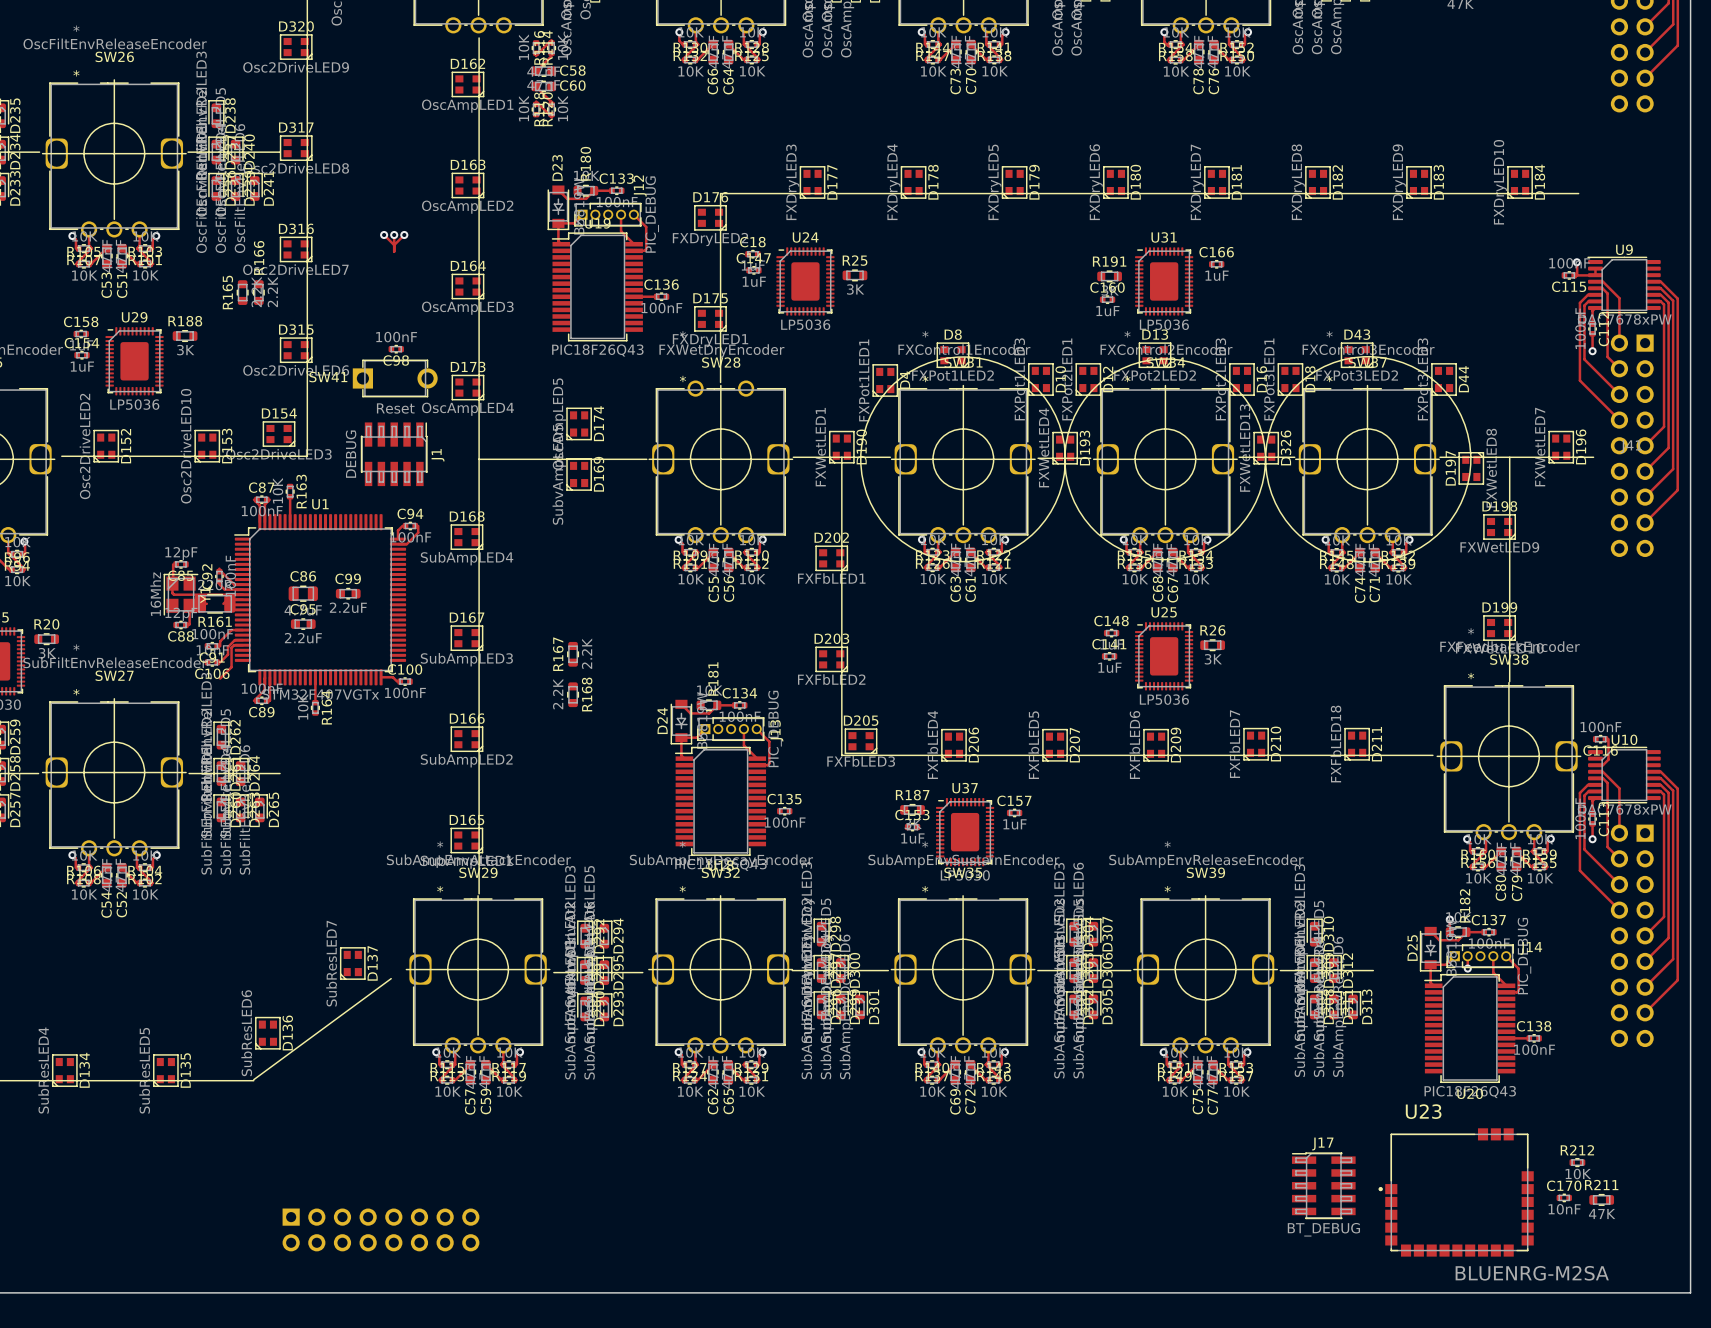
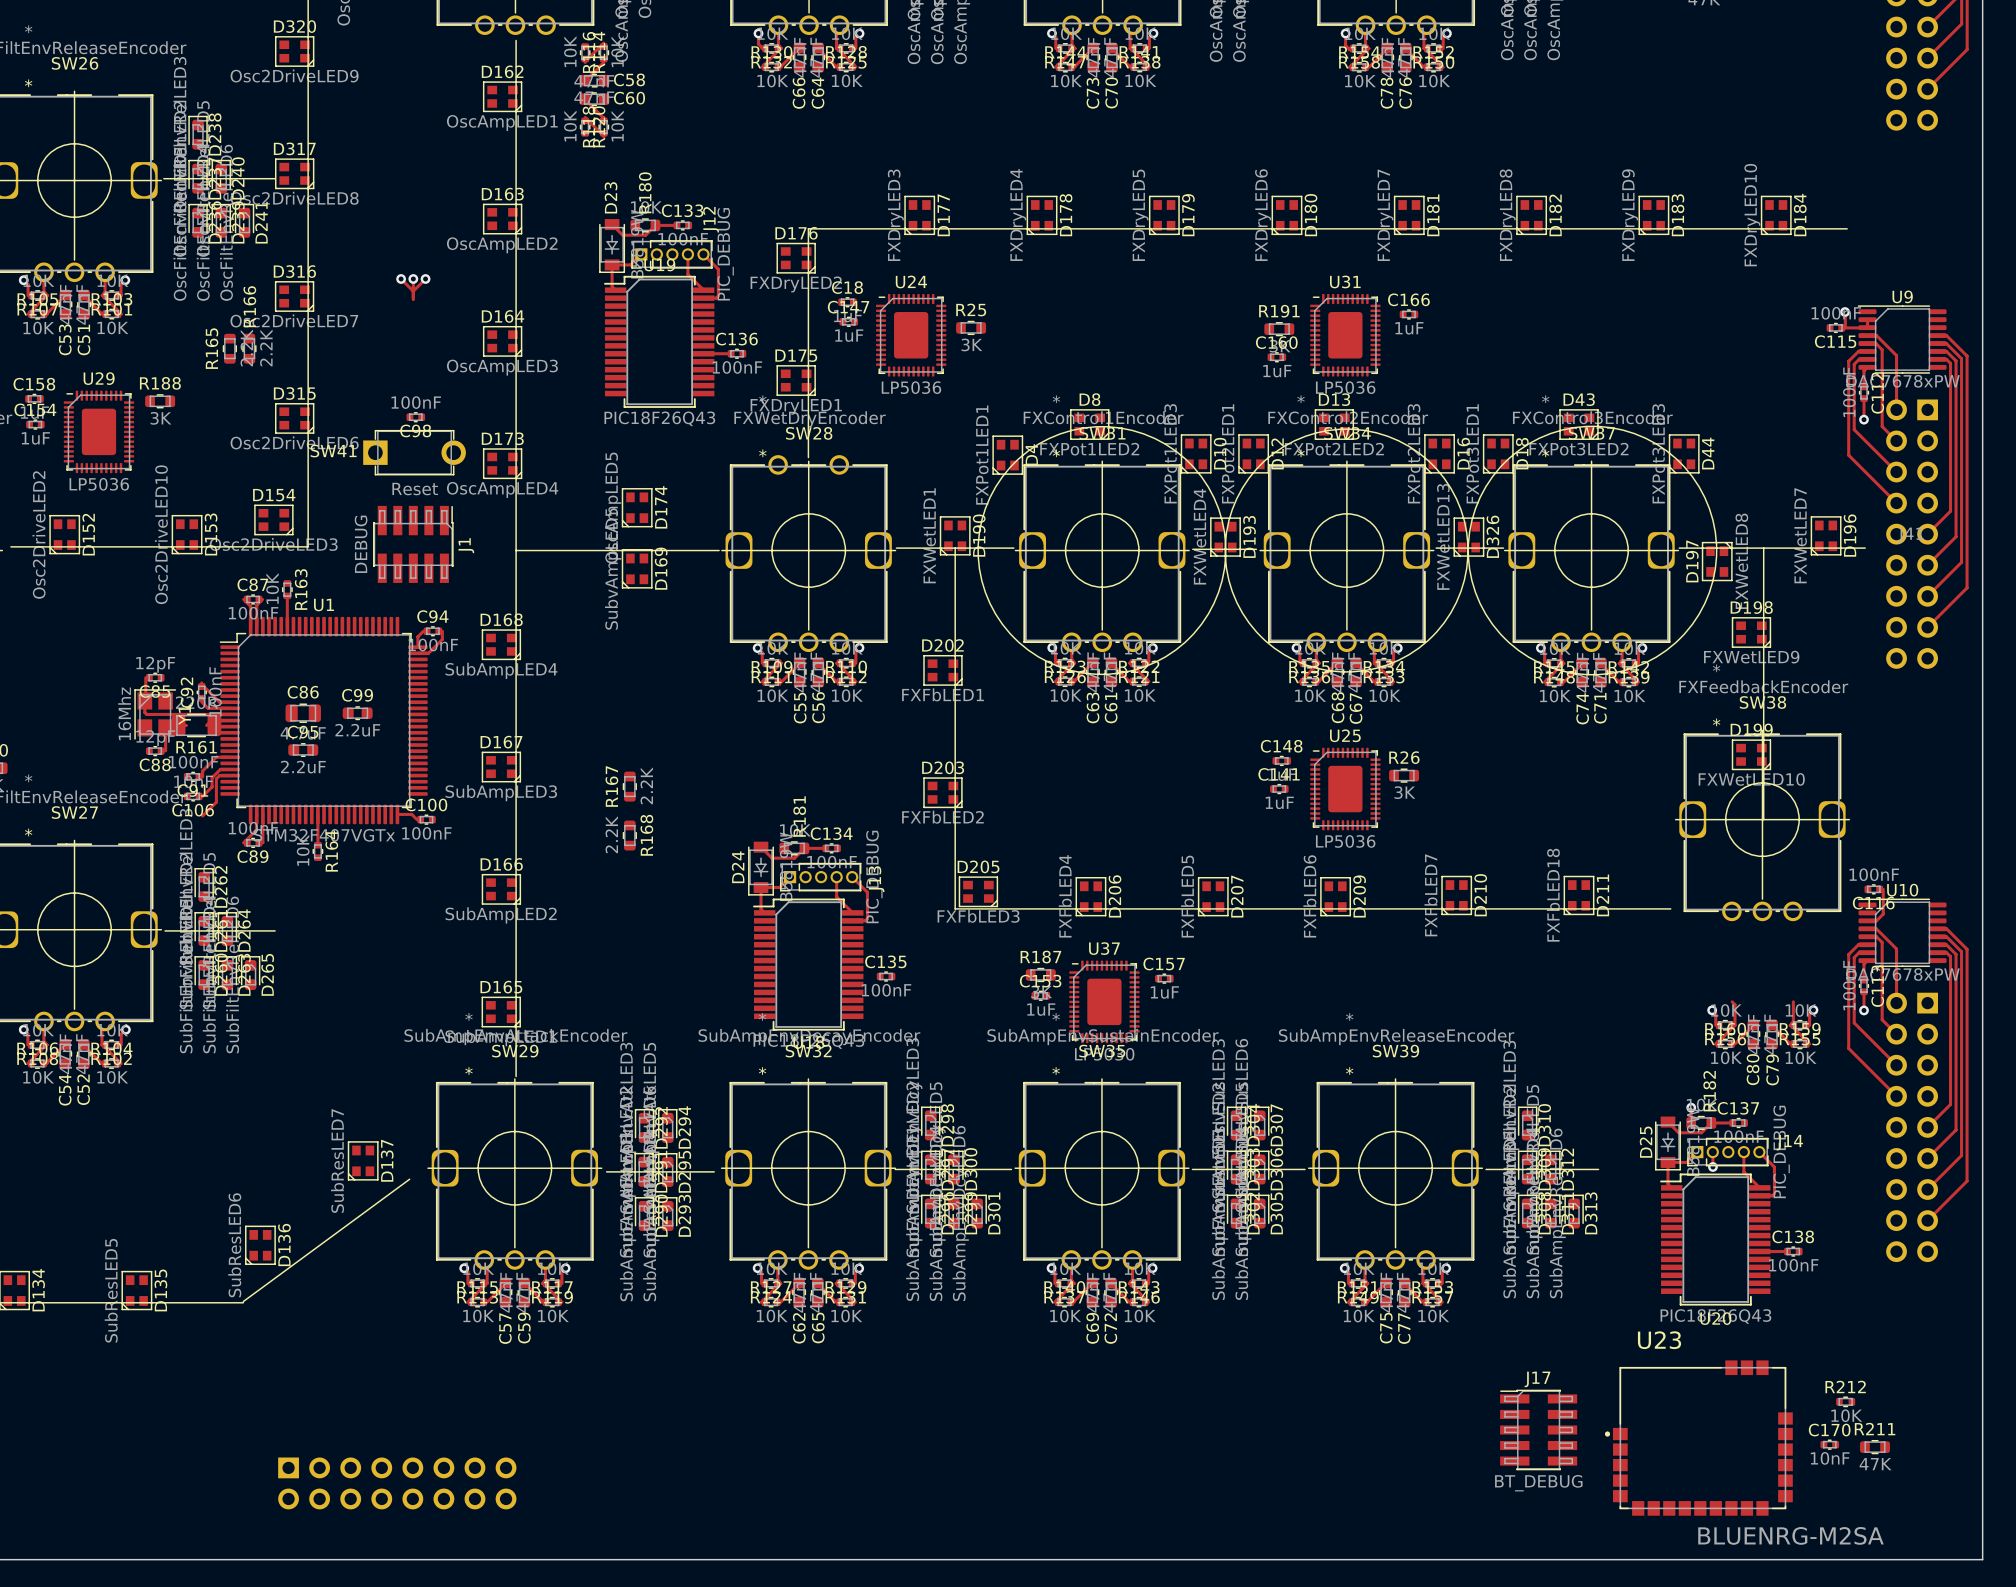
SW38 position: (1508, 761) -> (1762, 825)

